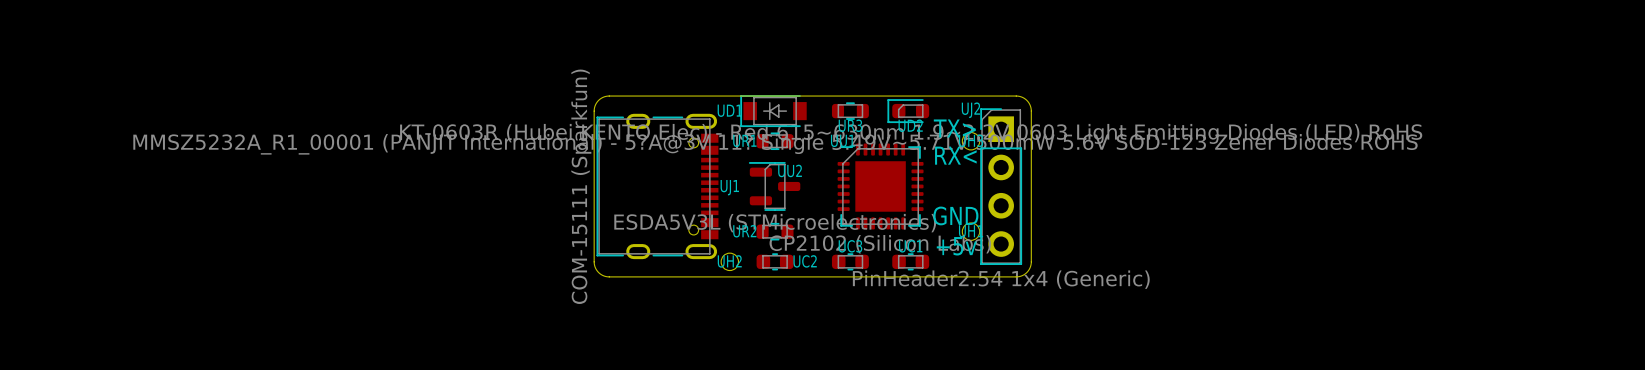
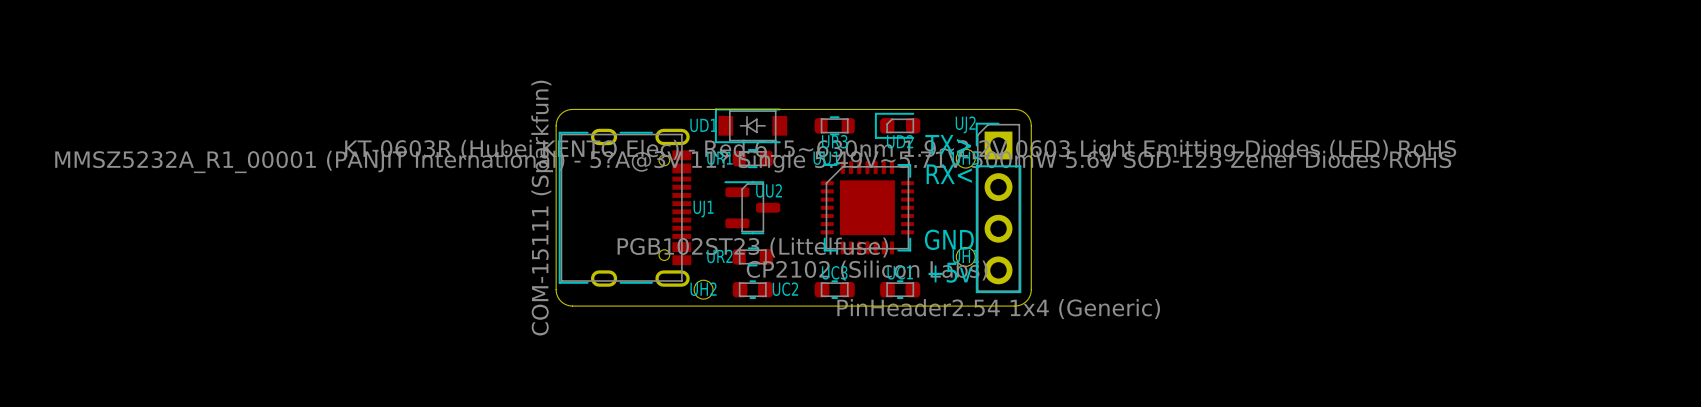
UU2 value: ESDA5V3L (STMicroelectronics) (775, 223) -> PGB102ST23 (Littelfuse) (752, 247)

